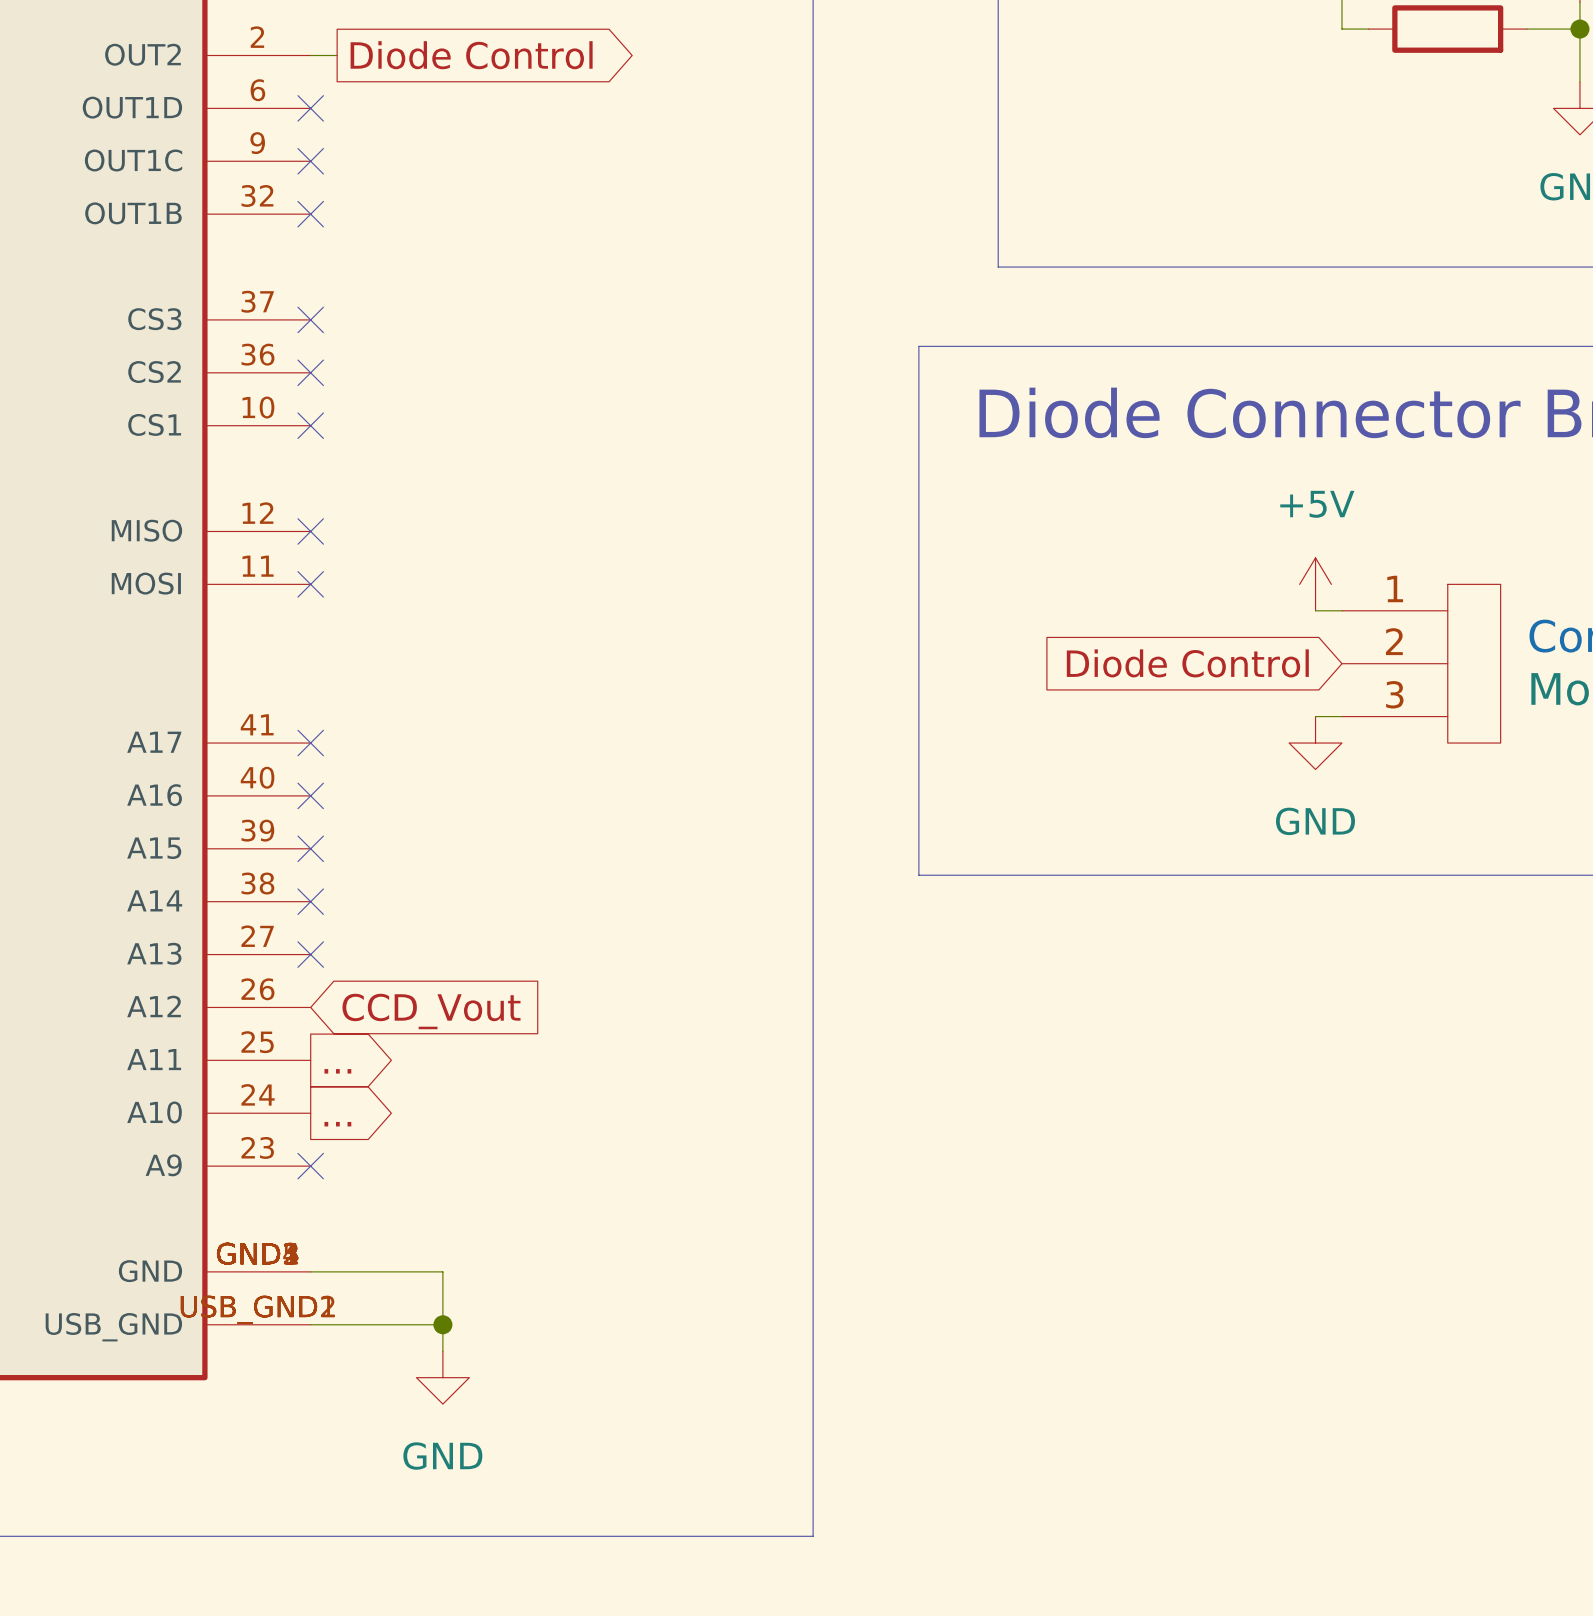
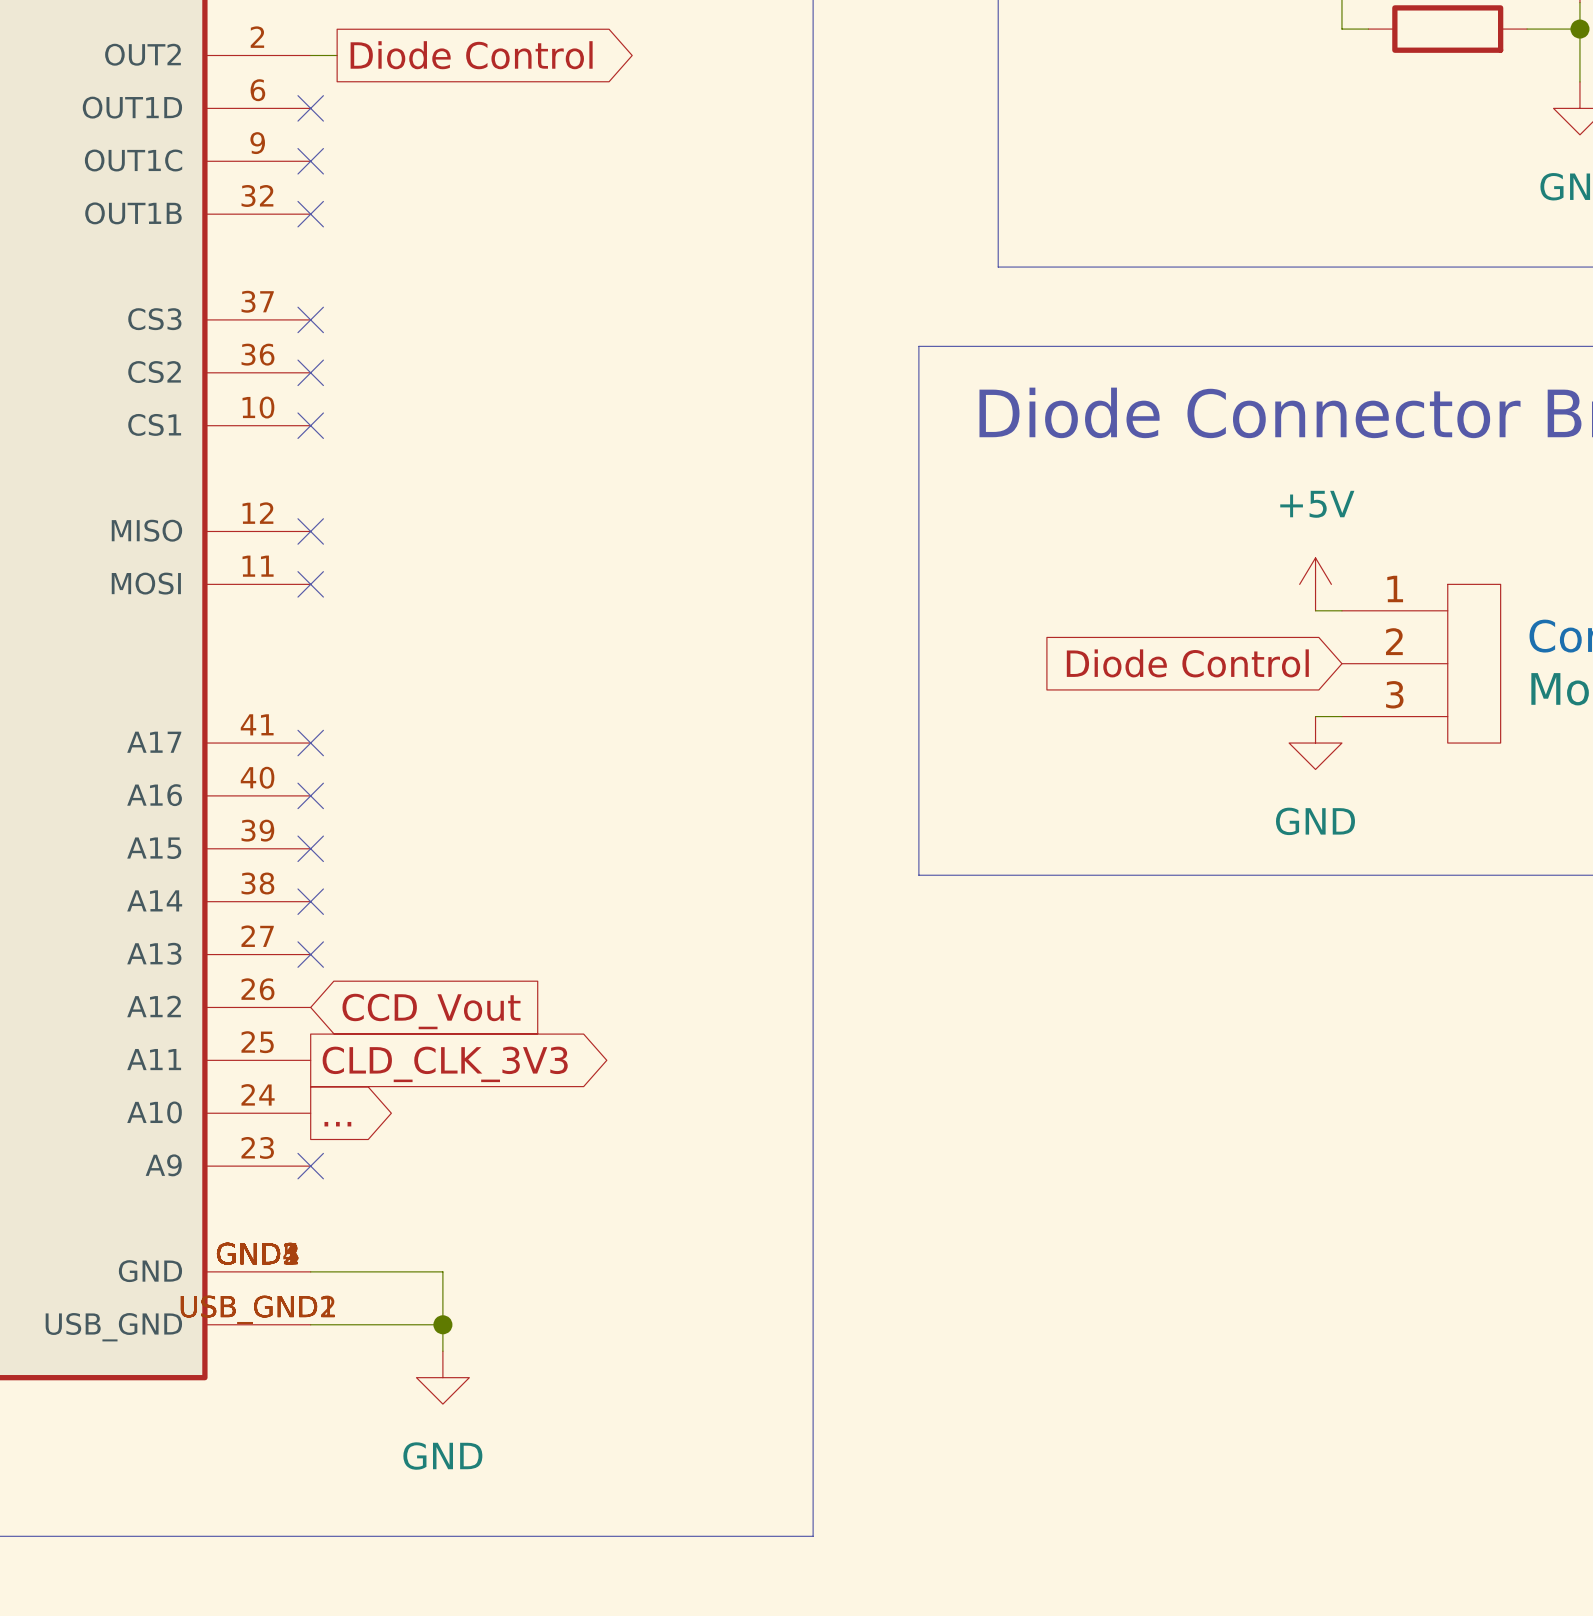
global label: ... (337, 1071) -> CLD_CLK_3V3 (445, 1064)

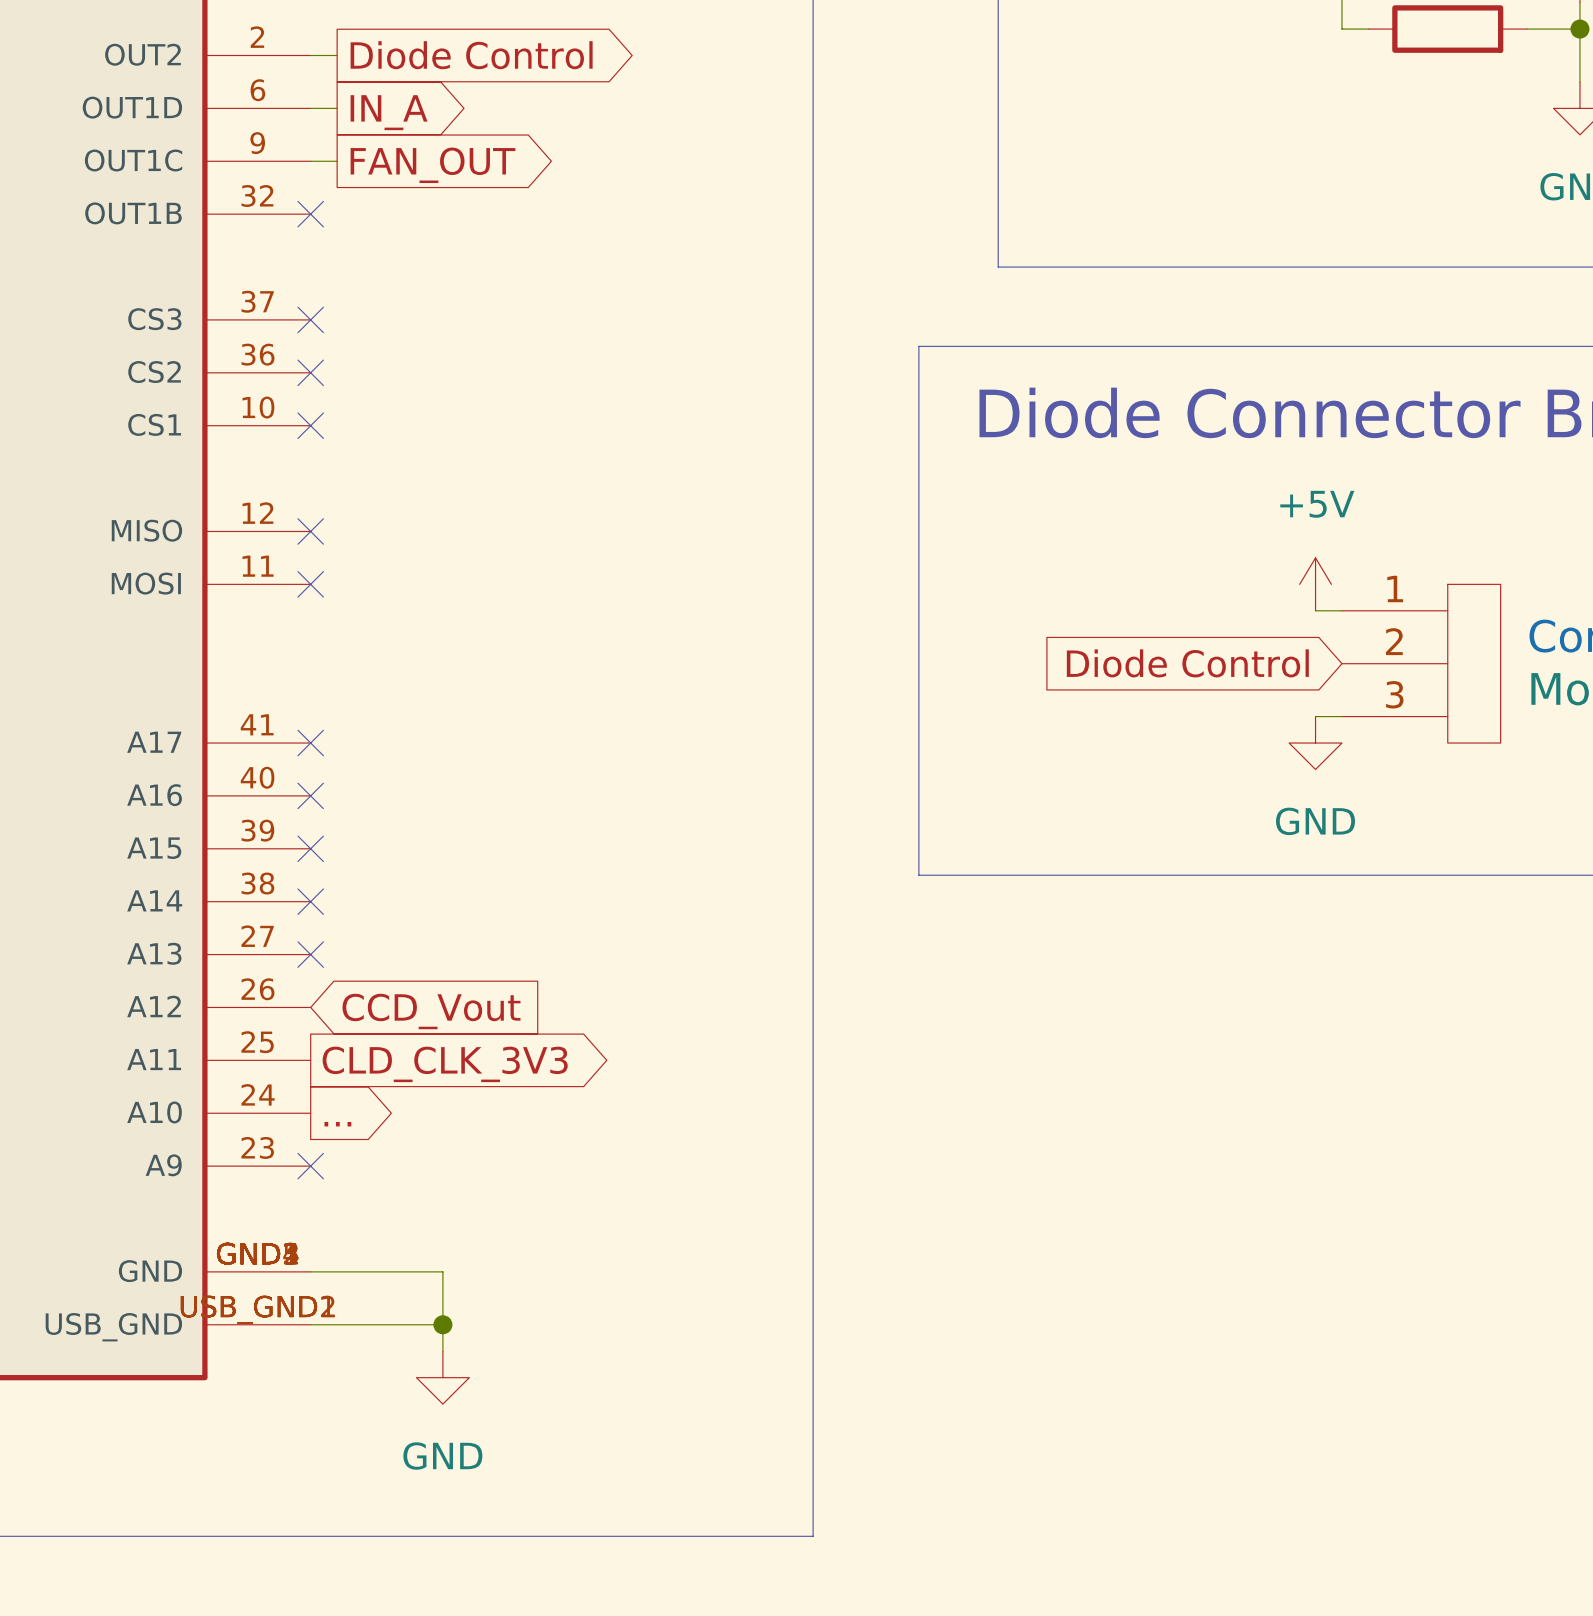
wire: none -> (310, 108) (337, 108)
no-connect mark: (310, 108) -> none
global label: none -> IN_A (389, 112)
wire: none -> (310, 161) (337, 161)
no-connect mark: (310, 161) -> none
global label: none -> FAN_OUT (432, 165)

